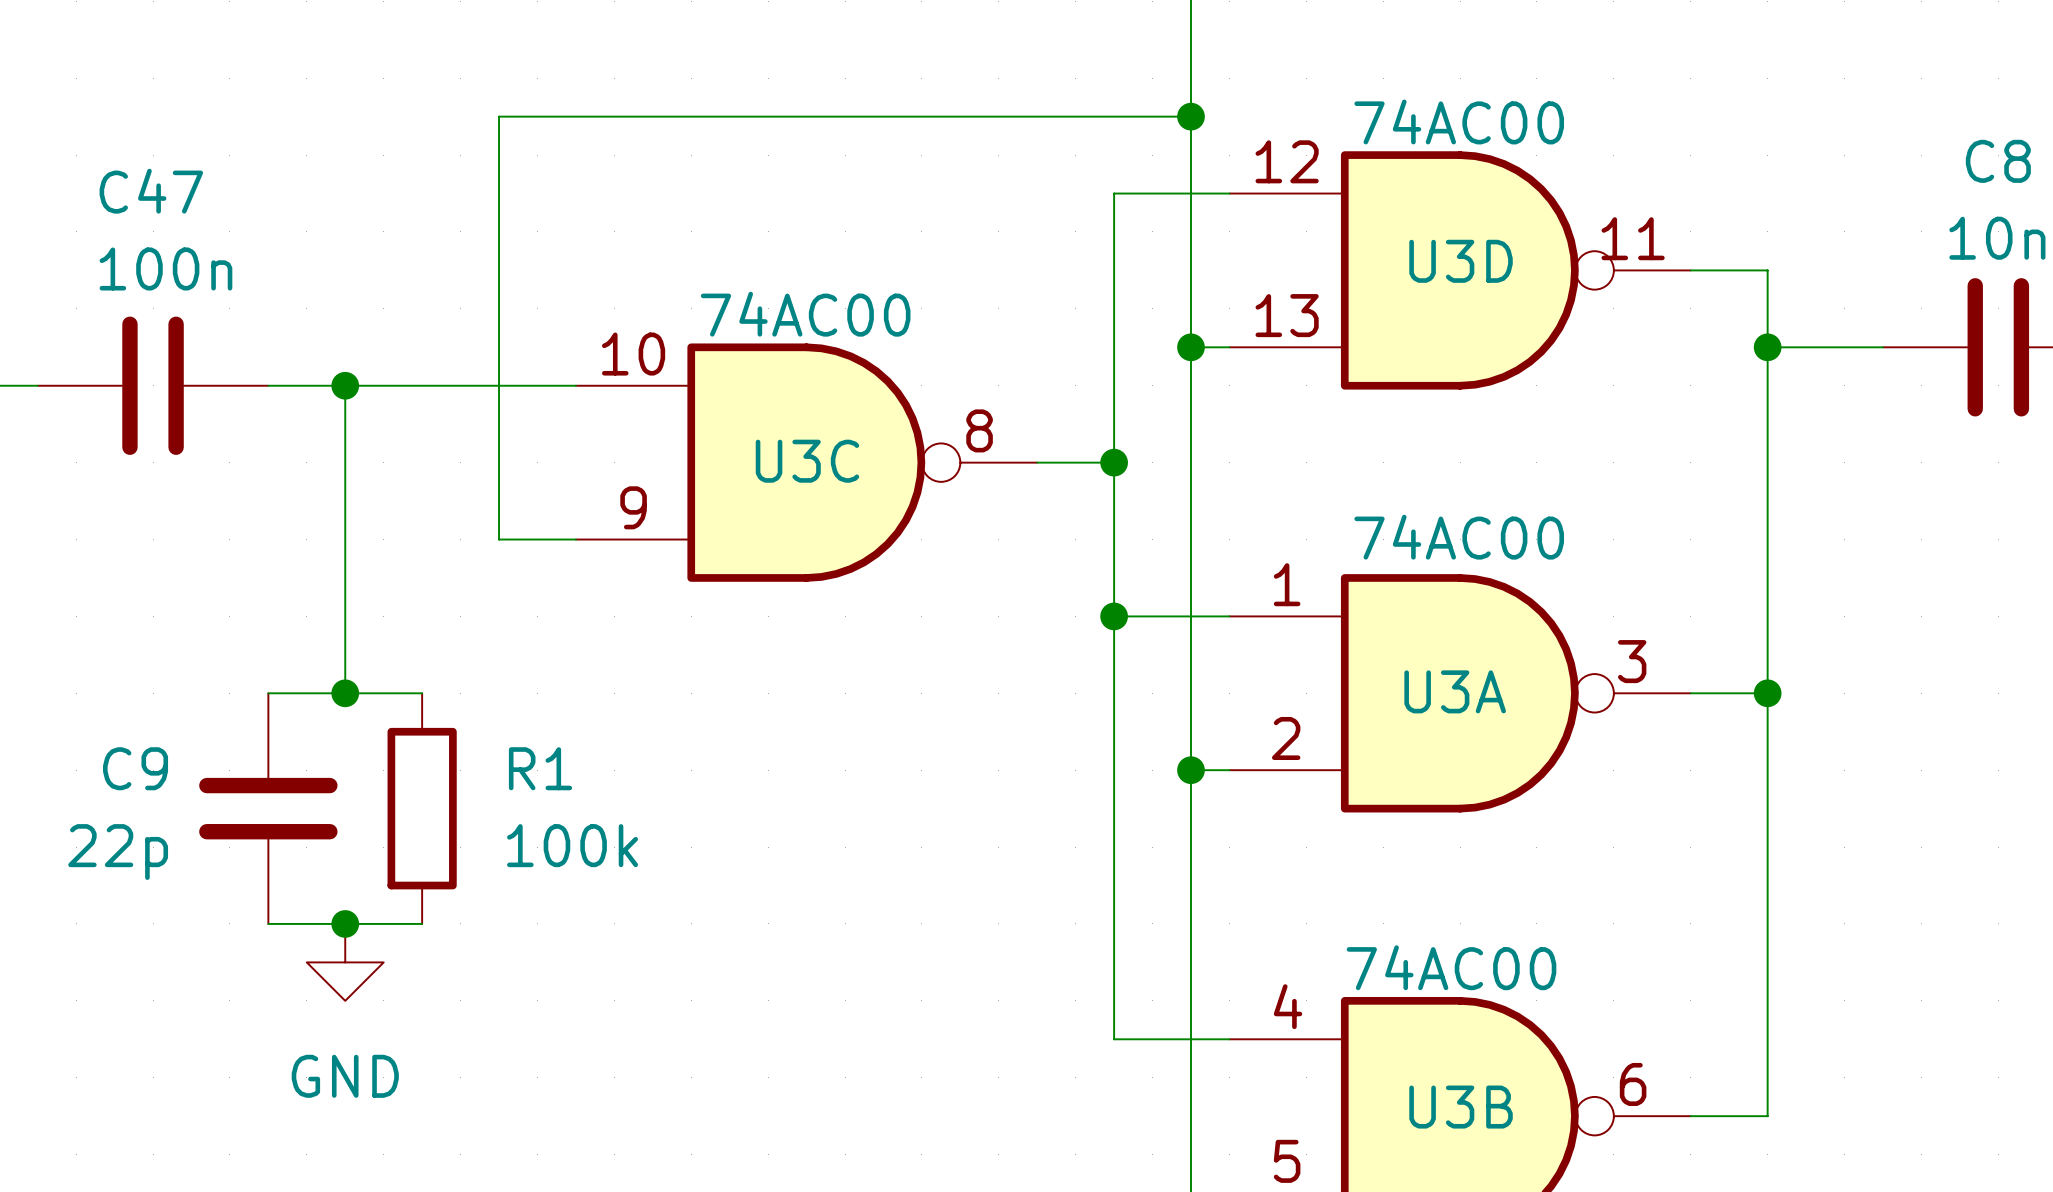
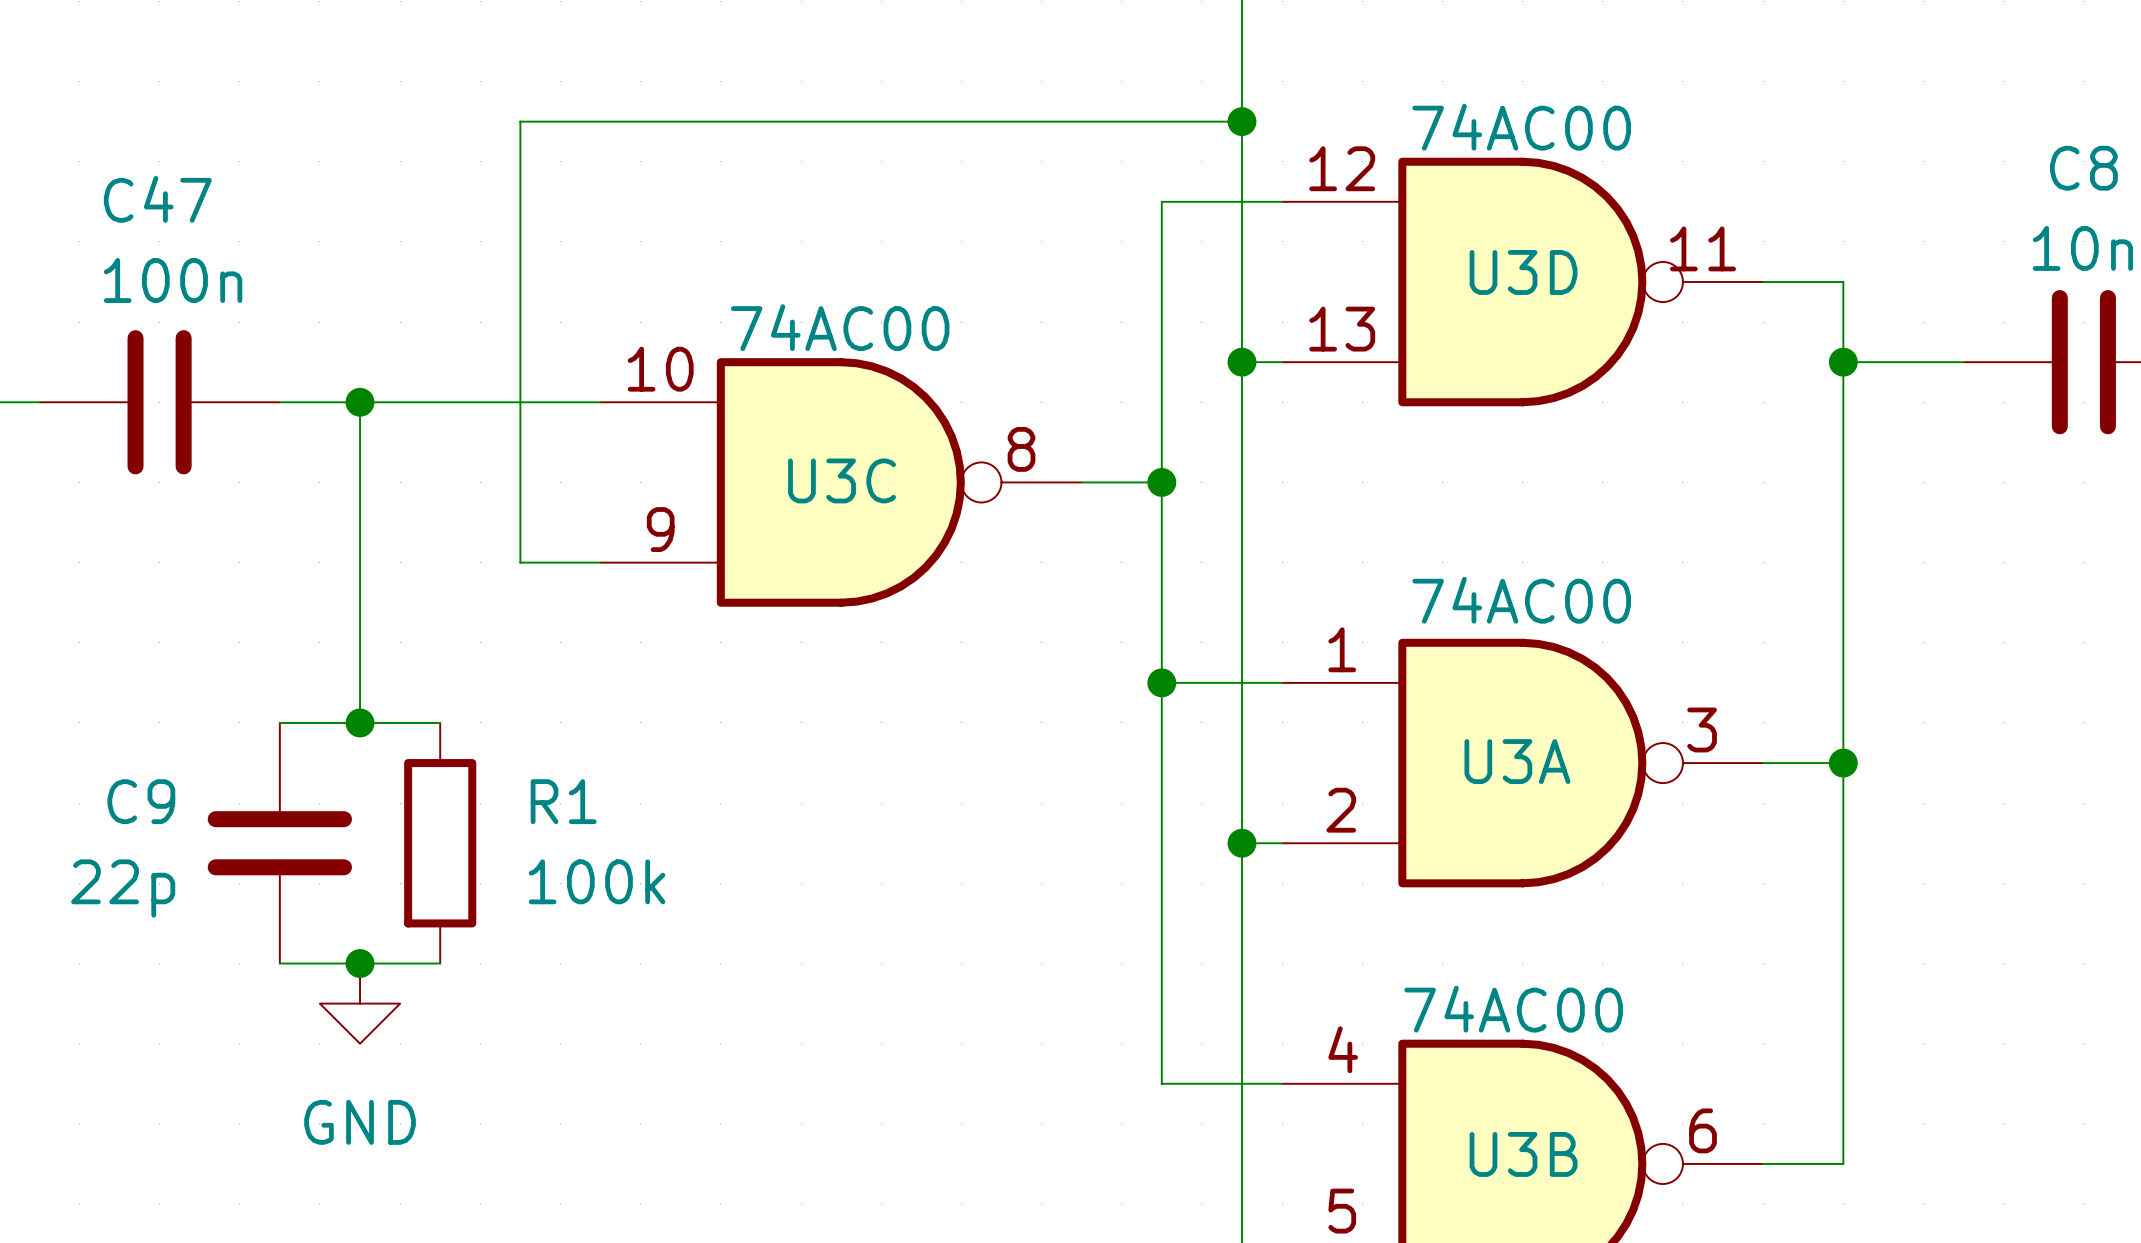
wire: (1114, 616) (1229, 616) -> (1161, 682) (1282, 682)
junction position: (1114, 616) -> (1161, 682)
U3A position: (1460, 693) -> (1522, 763)
wire: (1690, 693) (1767, 693) -> (1763, 763) (1843, 763)
junction position: (1767, 693) -> (1843, 763)
wire: (1191, 770) (1229, 770) -> (1241, 843) (1282, 843)
junction position: (1191, 770) -> (1241, 843)

